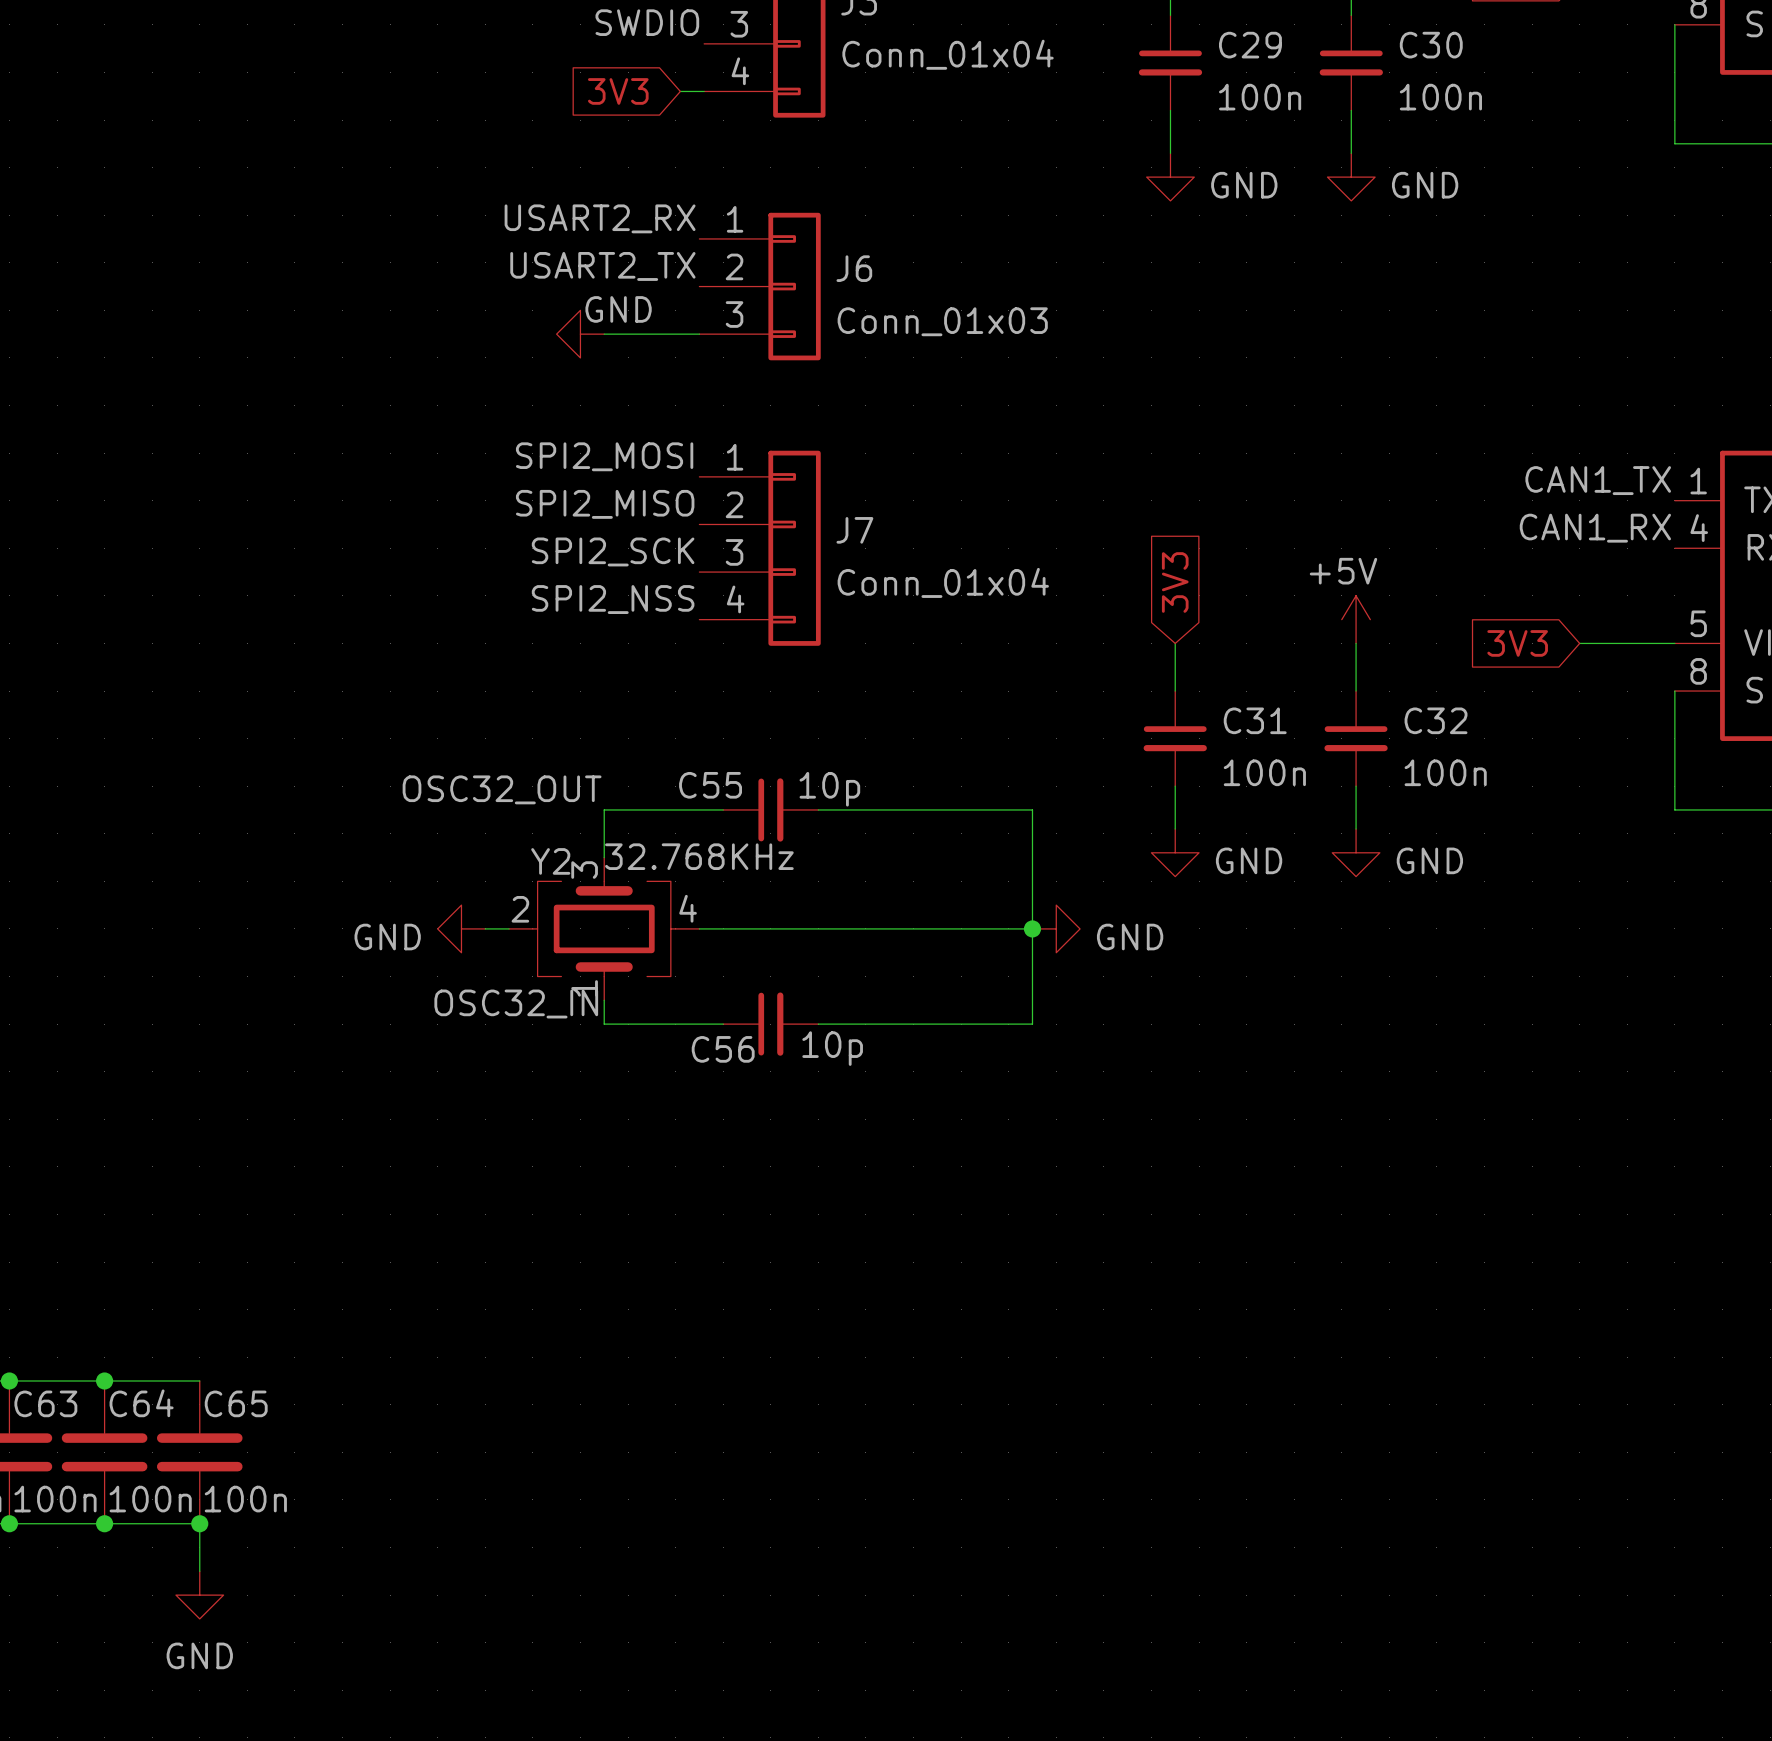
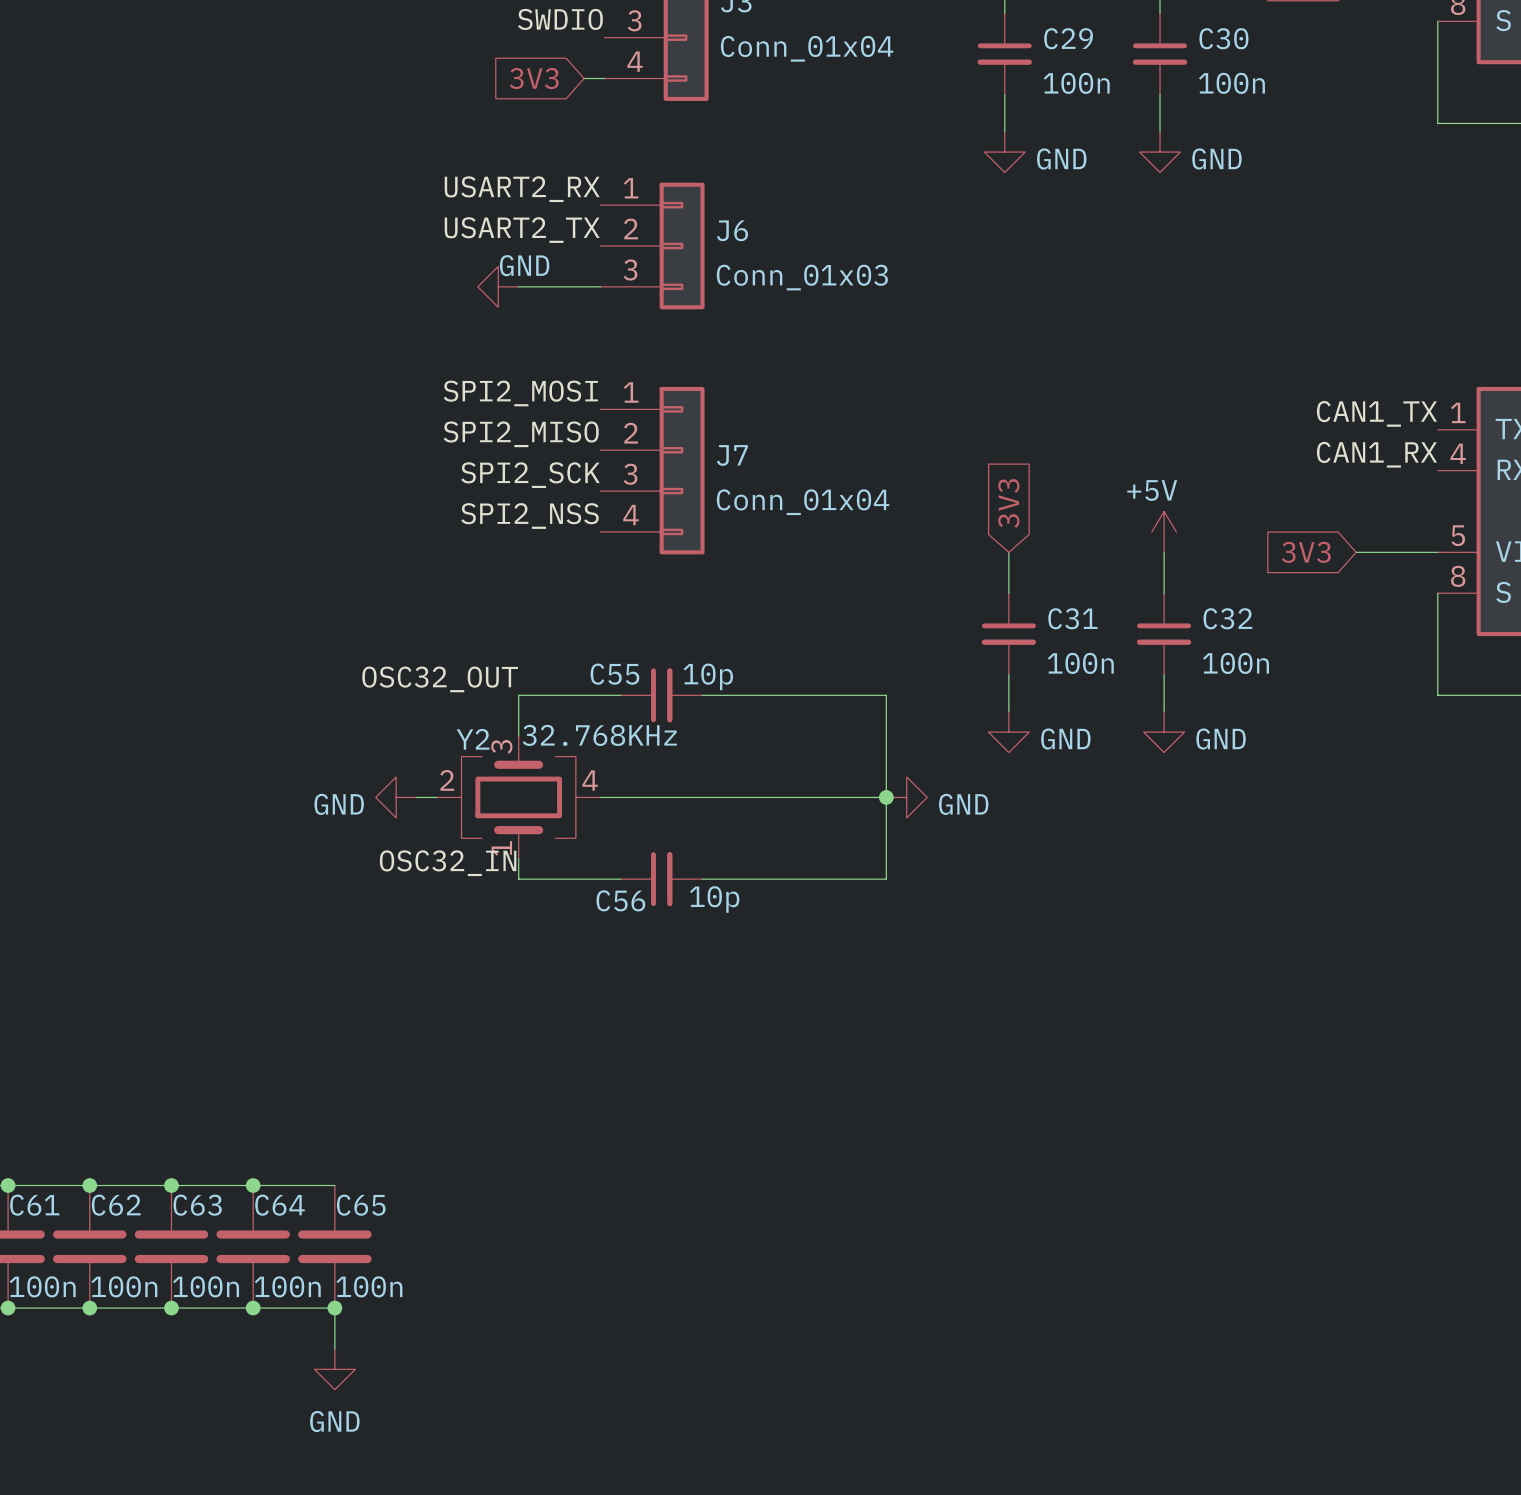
wire: none -> (171, 1185) (334, 1185)
junction: none -> (171, 1185)
junction: none -> (253, 1185)
C63 name: C63 (45, 1403) -> C61 (34, 1205)
C64 name: C64 (141, 1403) -> C62 (116, 1205)
C65 name: C65 (236, 1403) -> C63 (197, 1205)
C64: none -> 100n (253, 1246)
C65: none -> 100n (334, 1246)
wire: (199, 1523) (199, 1571) -> (171, 1308) (334, 1308) (334, 1348)
junction: none -> (253, 1308)
junction: none -> (334, 1308)
power symbol position: GND (199, 1595) -> GND (334, 1369)

